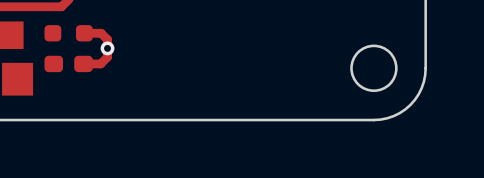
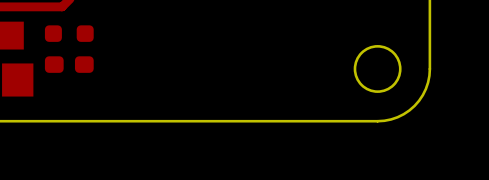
top track: (84, 33) (101, 33) (107, 39) (107, 57) (100, 63) (83, 63) -> none
via: (107, 48) -> none

